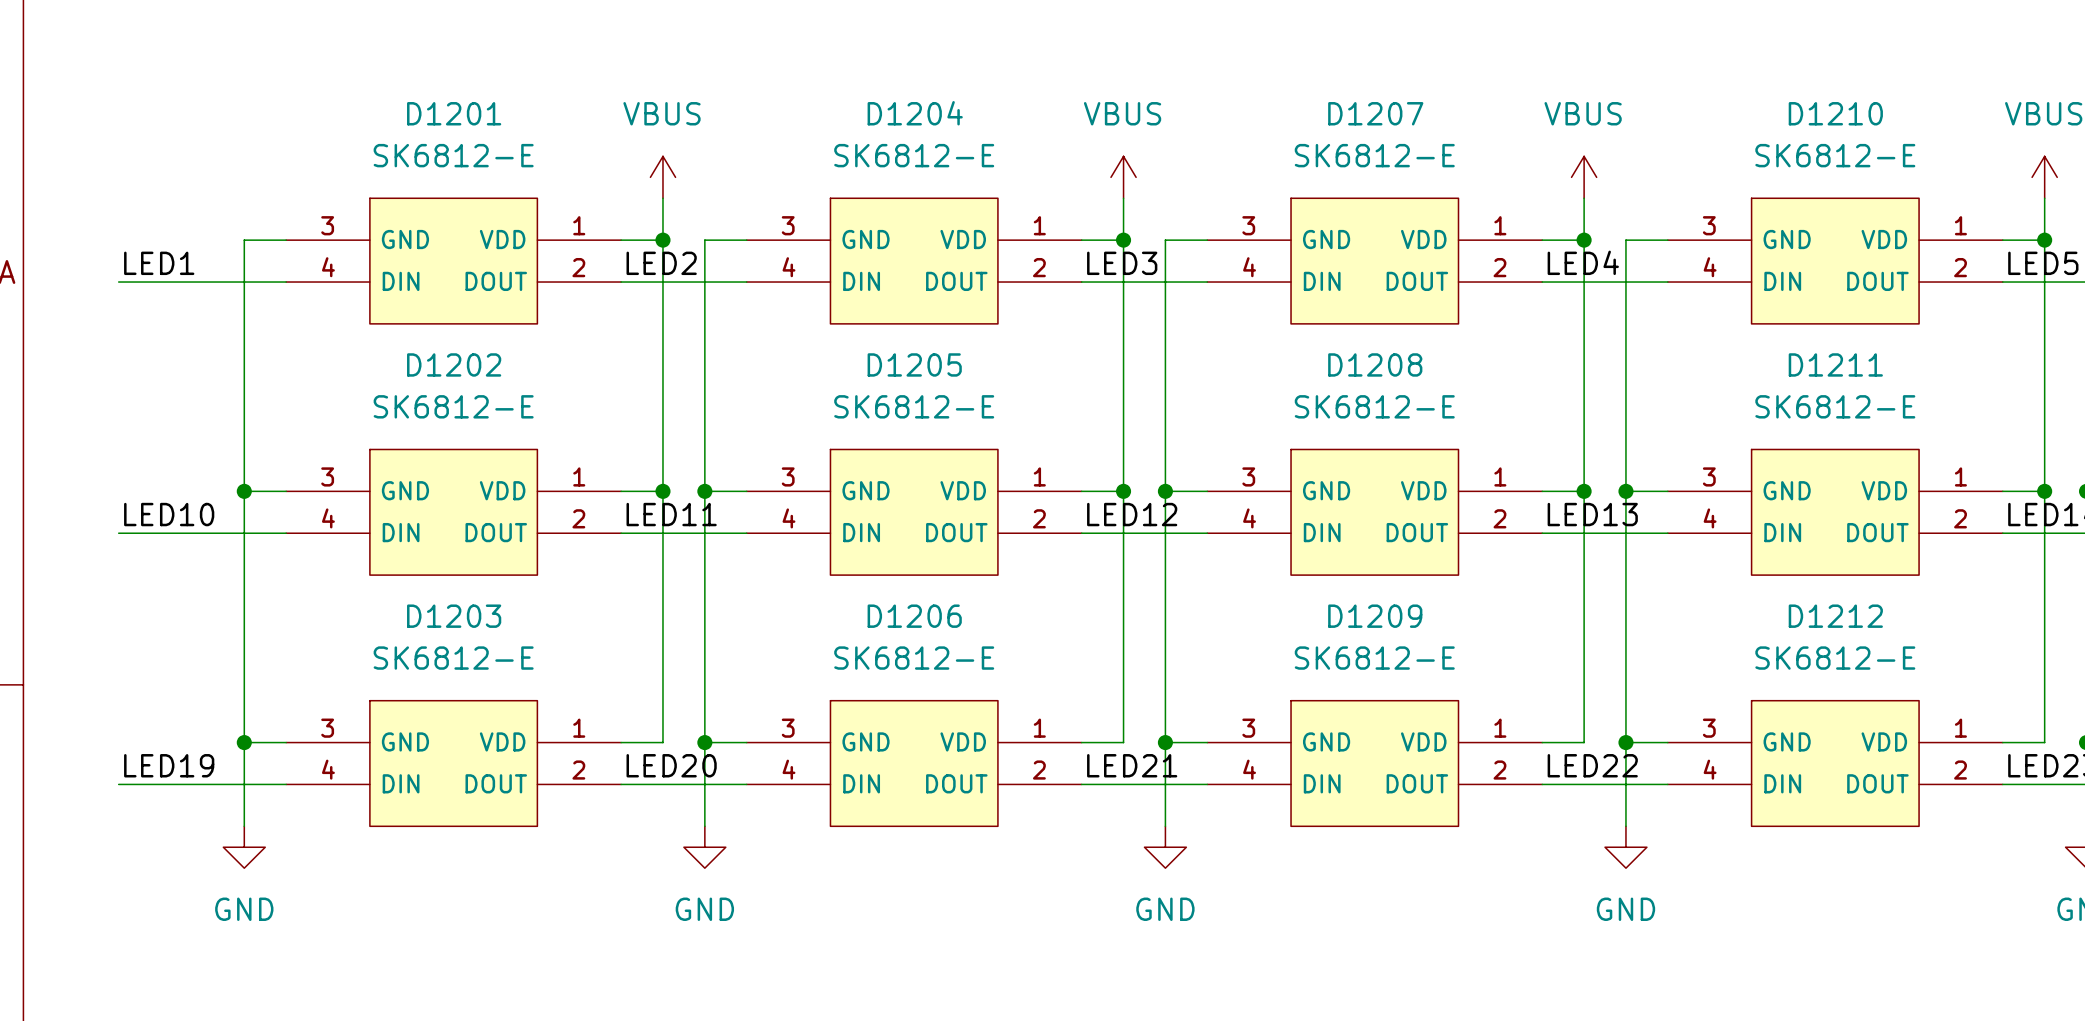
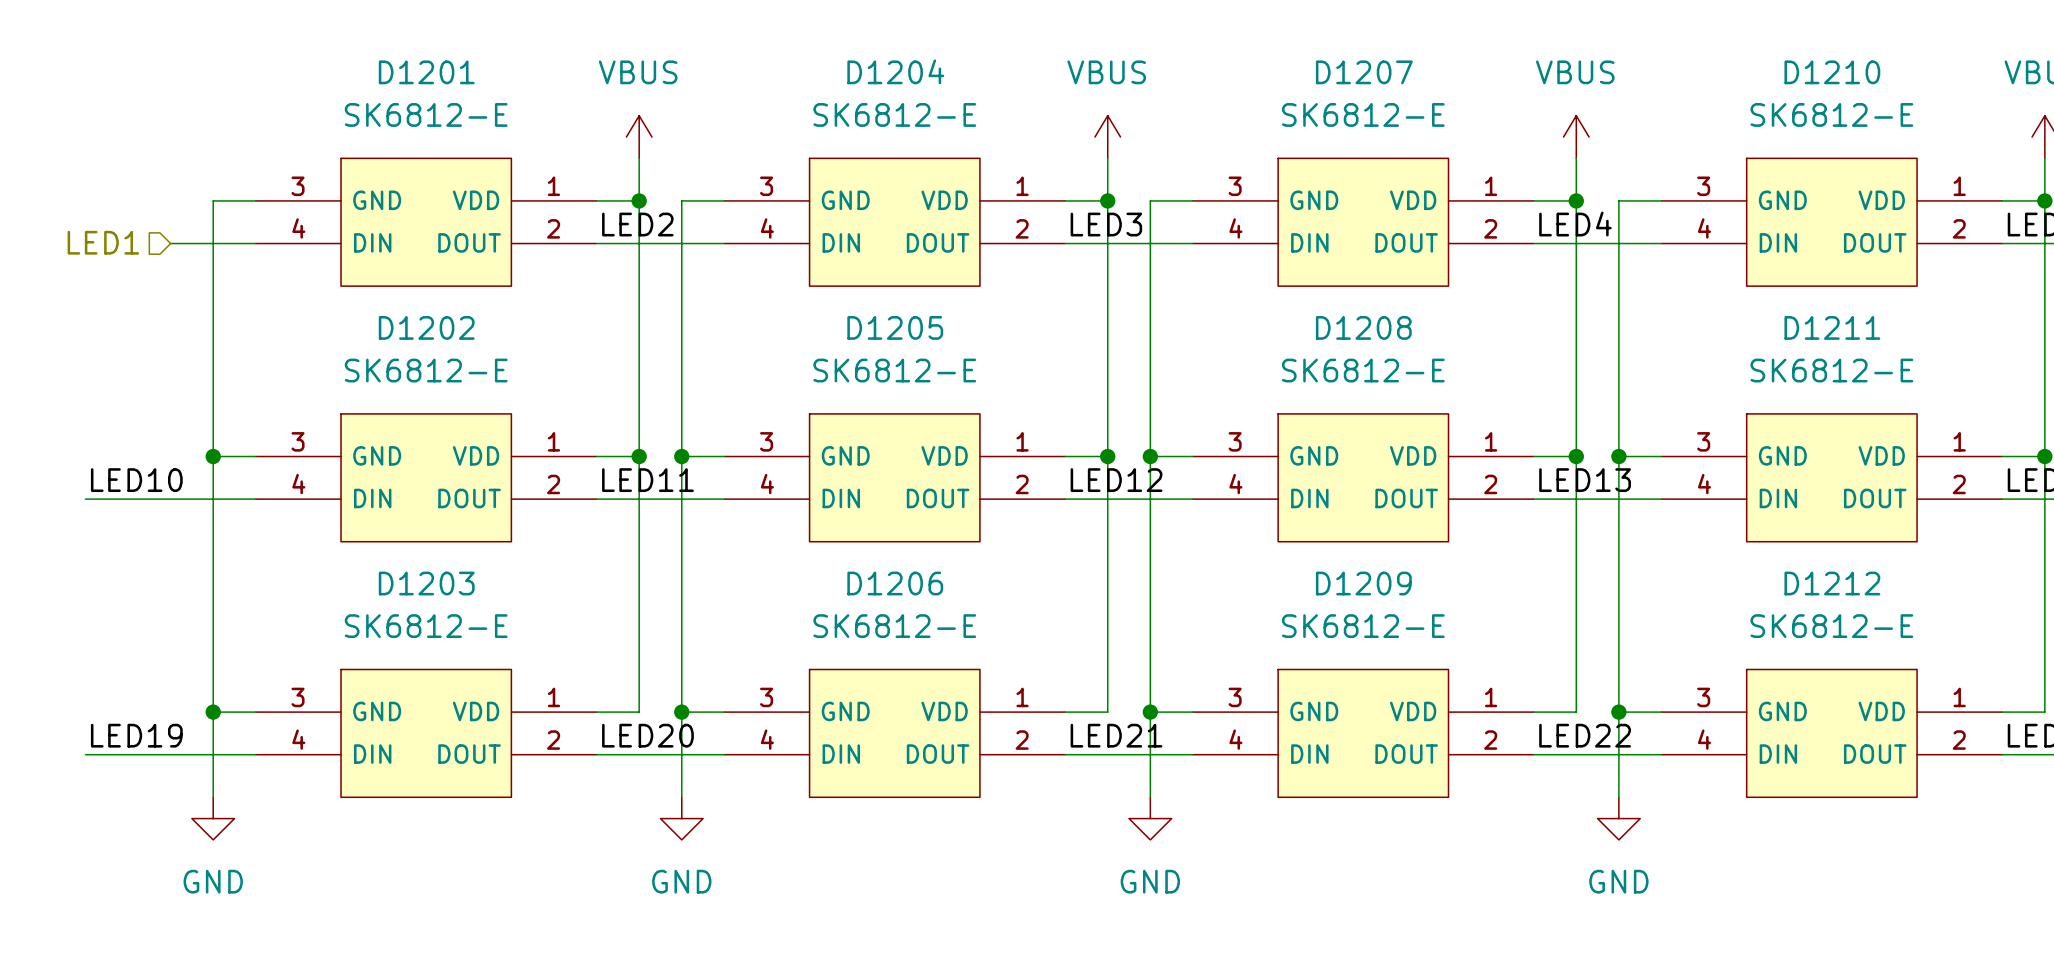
label: LED1 (159, 263) -> none
hierarchical label: none -> LED1 (103, 242)
wire: (118, 282) (202, 282) -> none

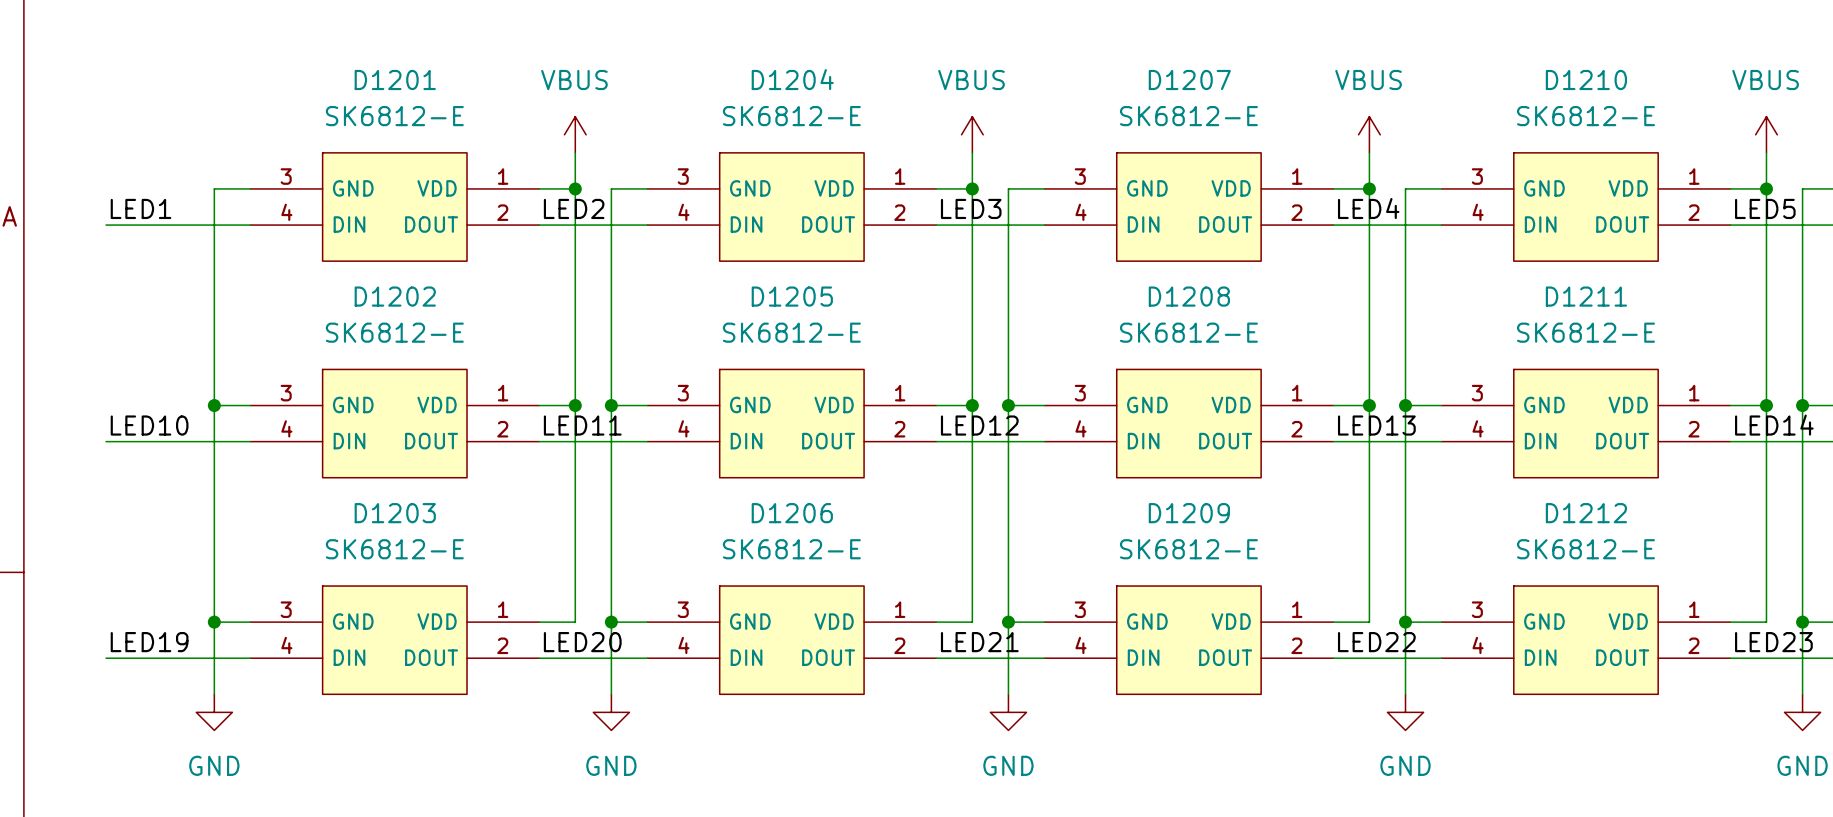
label: none -> LED1 (140, 208)
hierarchical label: LED1 (103, 242) -> none
wire: none -> (106, 225) (178, 225)

